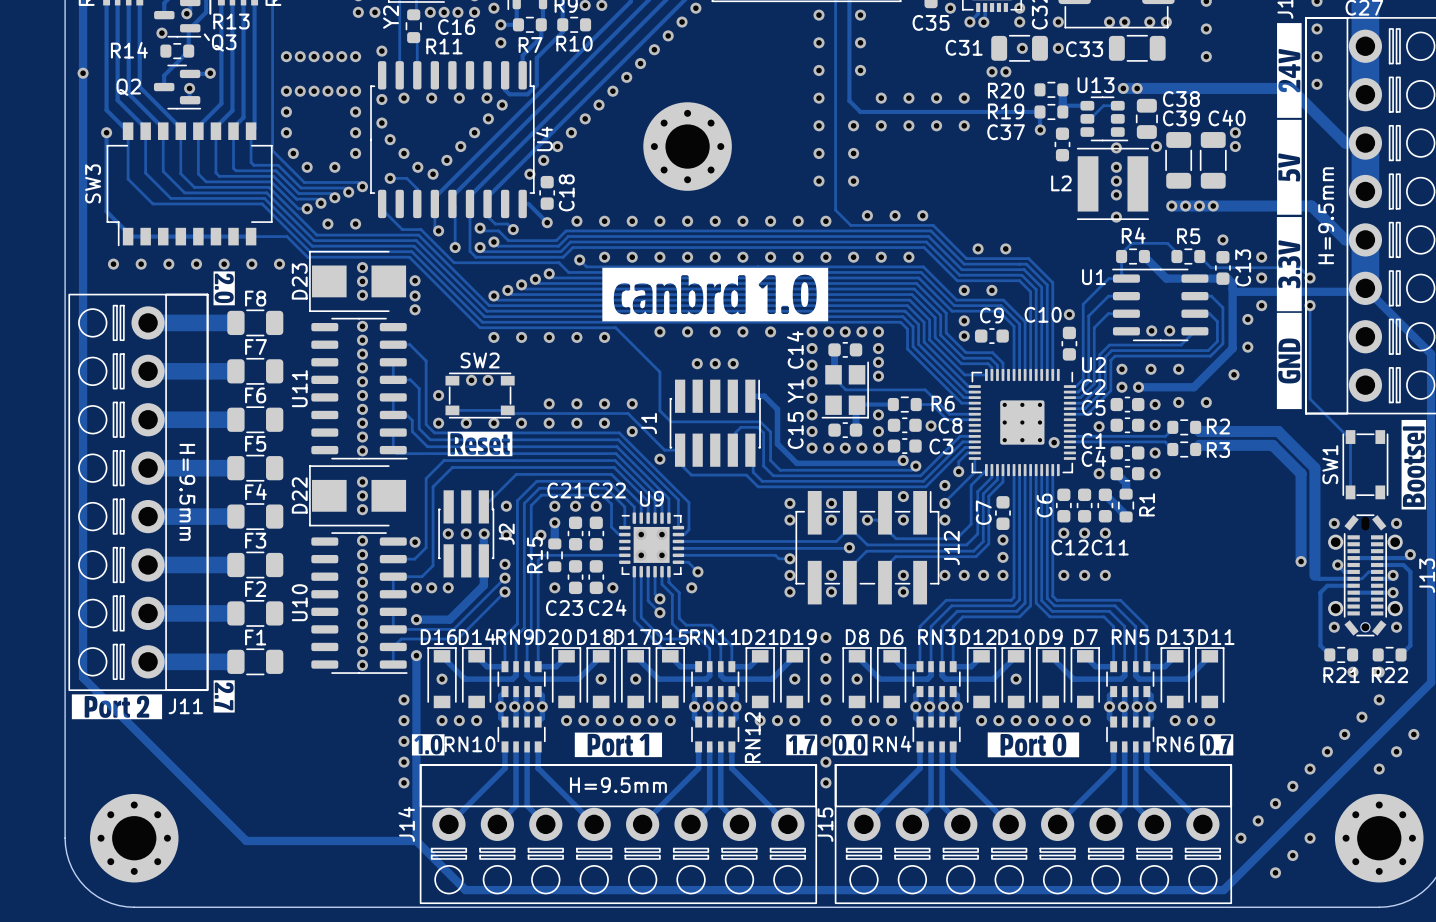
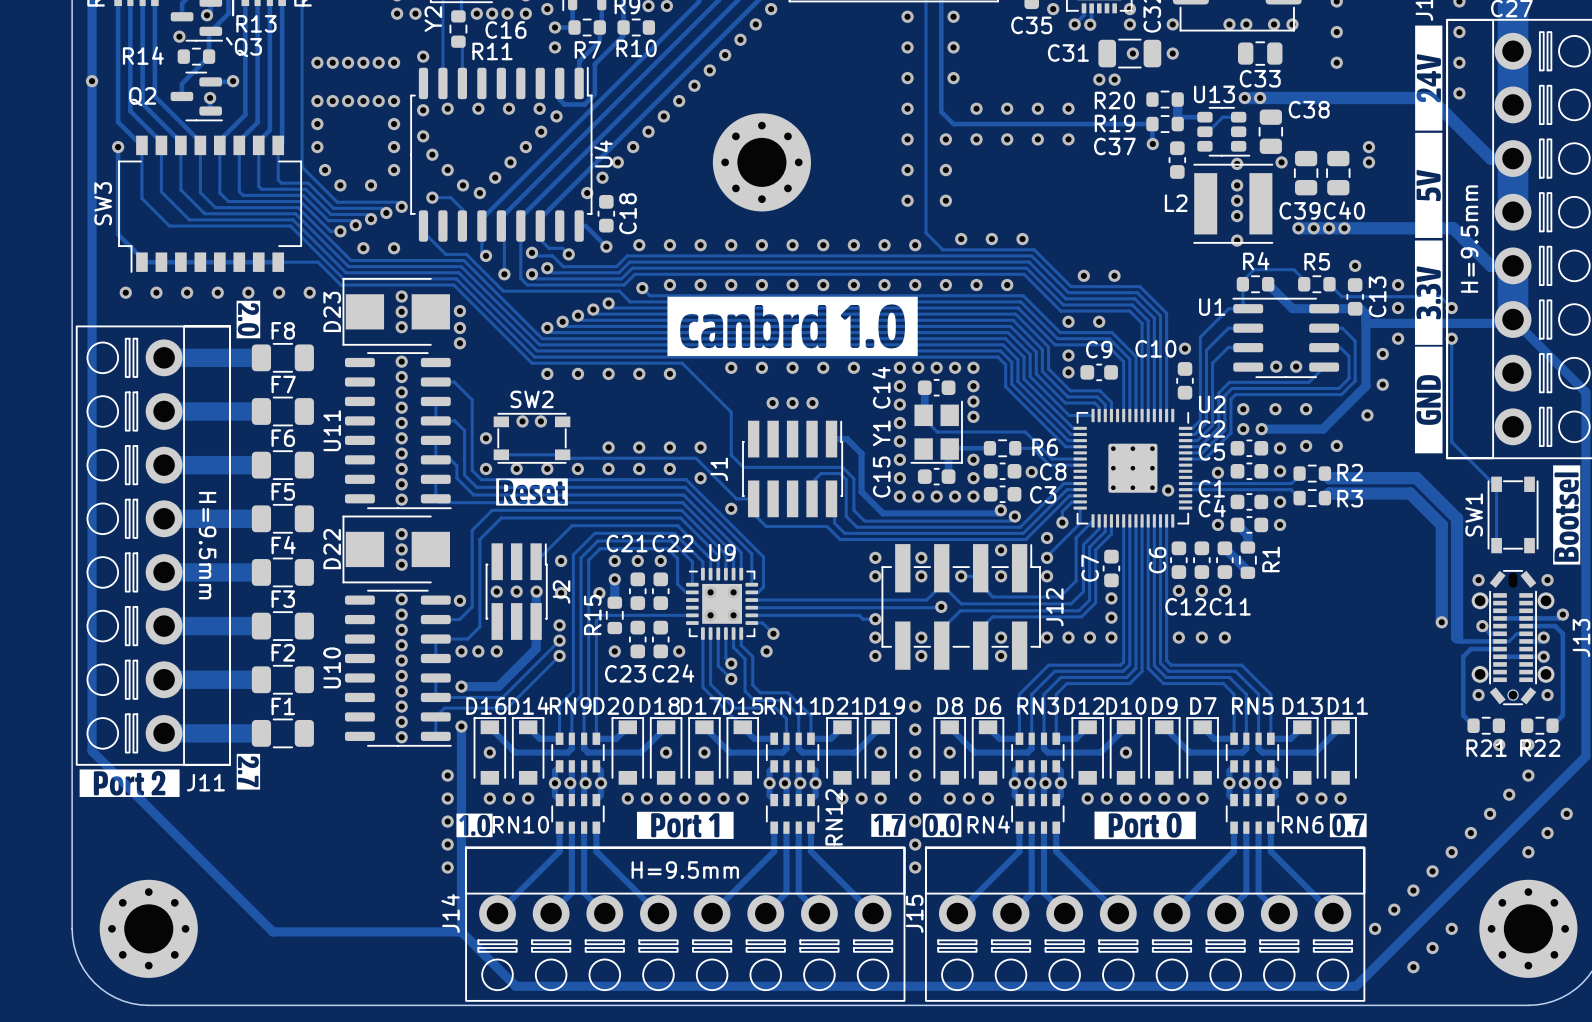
C33 footprint: [1108, 34, 1166, 62] -> [1238, 41, 1283, 66]
C33 name position: C33 (1084, 49) -> C33 (1260, 78)
C39 name position: C39 (1181, 118) -> C39 (1299, 210)
C40 name position: C40 (1227, 118) -> C40 (1344, 210)
C39 footprint: [1165, 132, 1193, 189] -> [1293, 150, 1319, 196]
C40 footprint: [1199, 132, 1227, 189] -> [1326, 150, 1351, 196]

